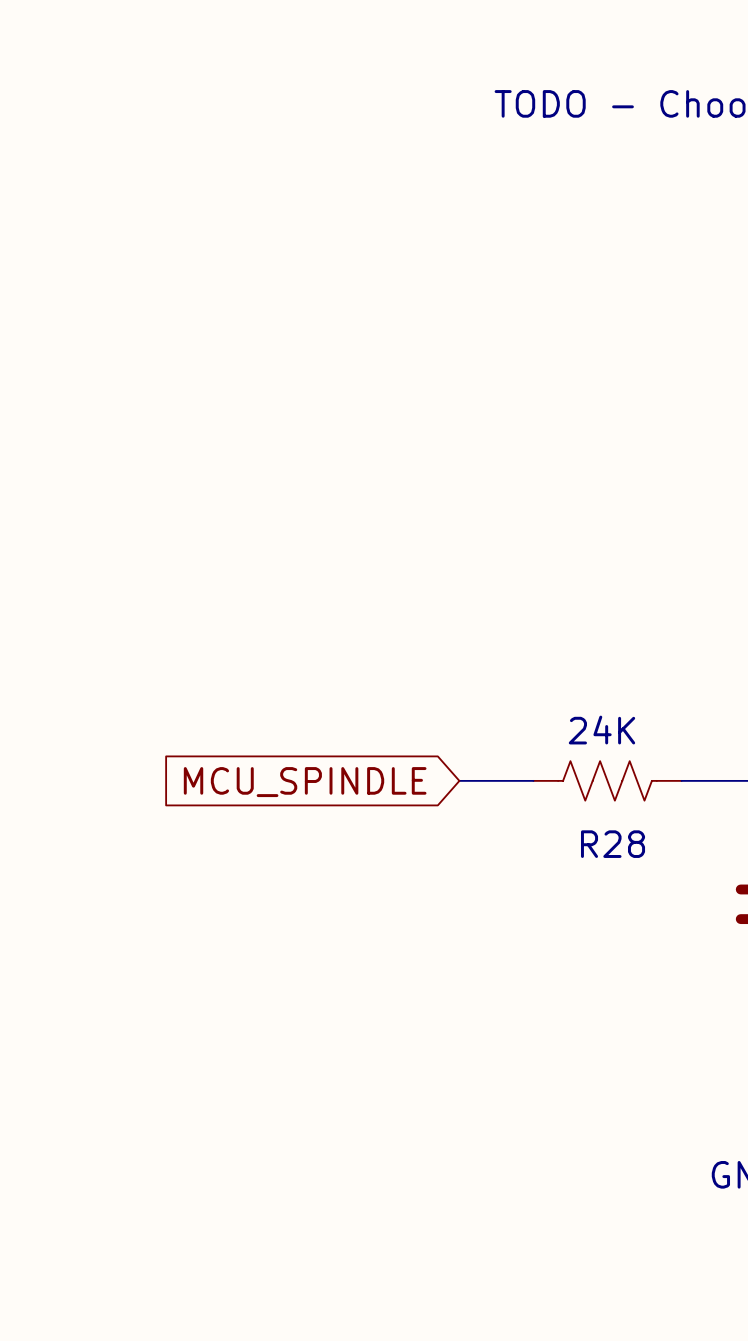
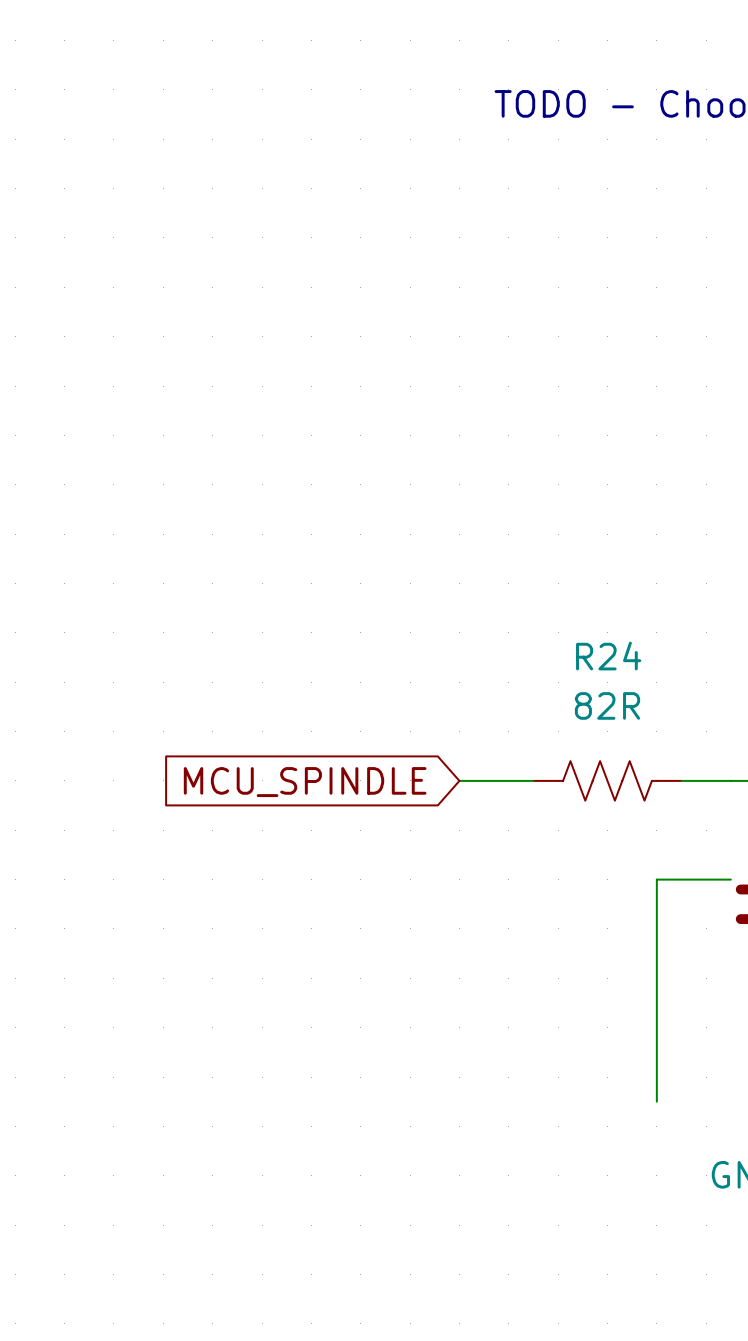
R28 value: 24K (601, 730) -> 82R (607, 705)
R28 name: R28 (613, 844) -> R24 (608, 656)
wire: none -> (730, 879) (656, 879) (656, 1101)

